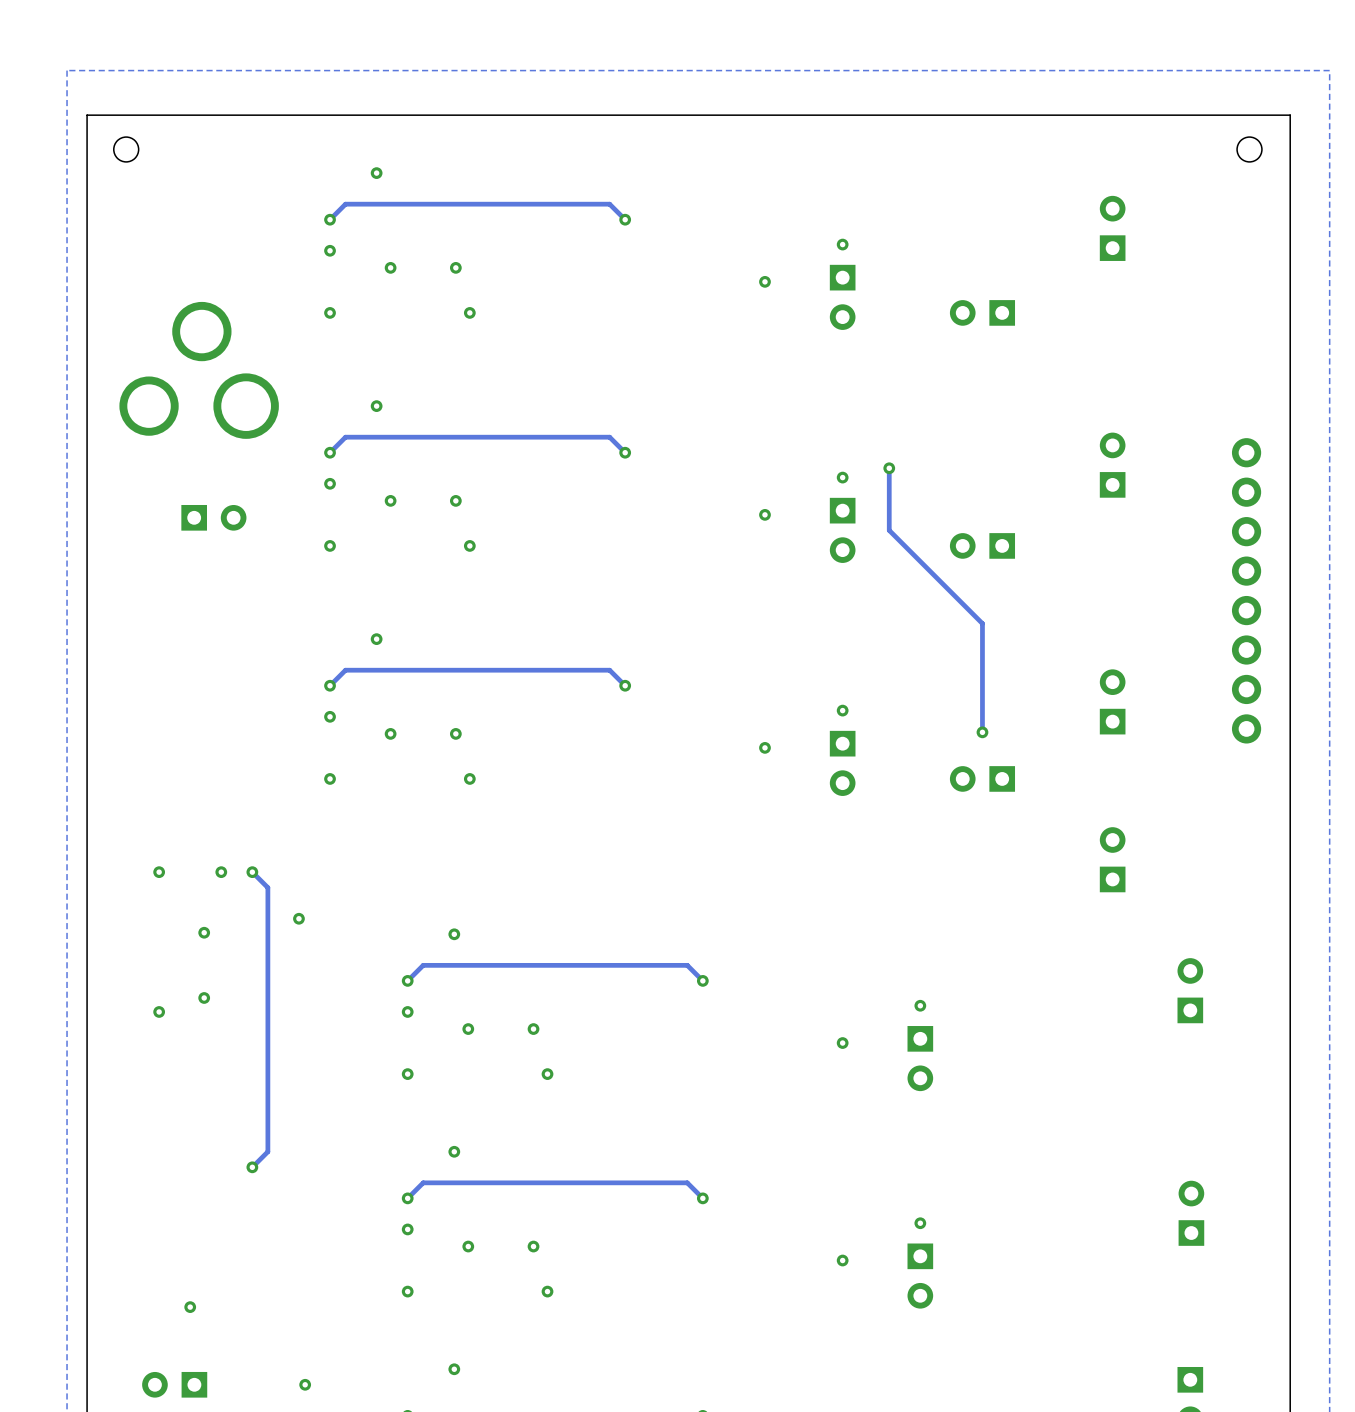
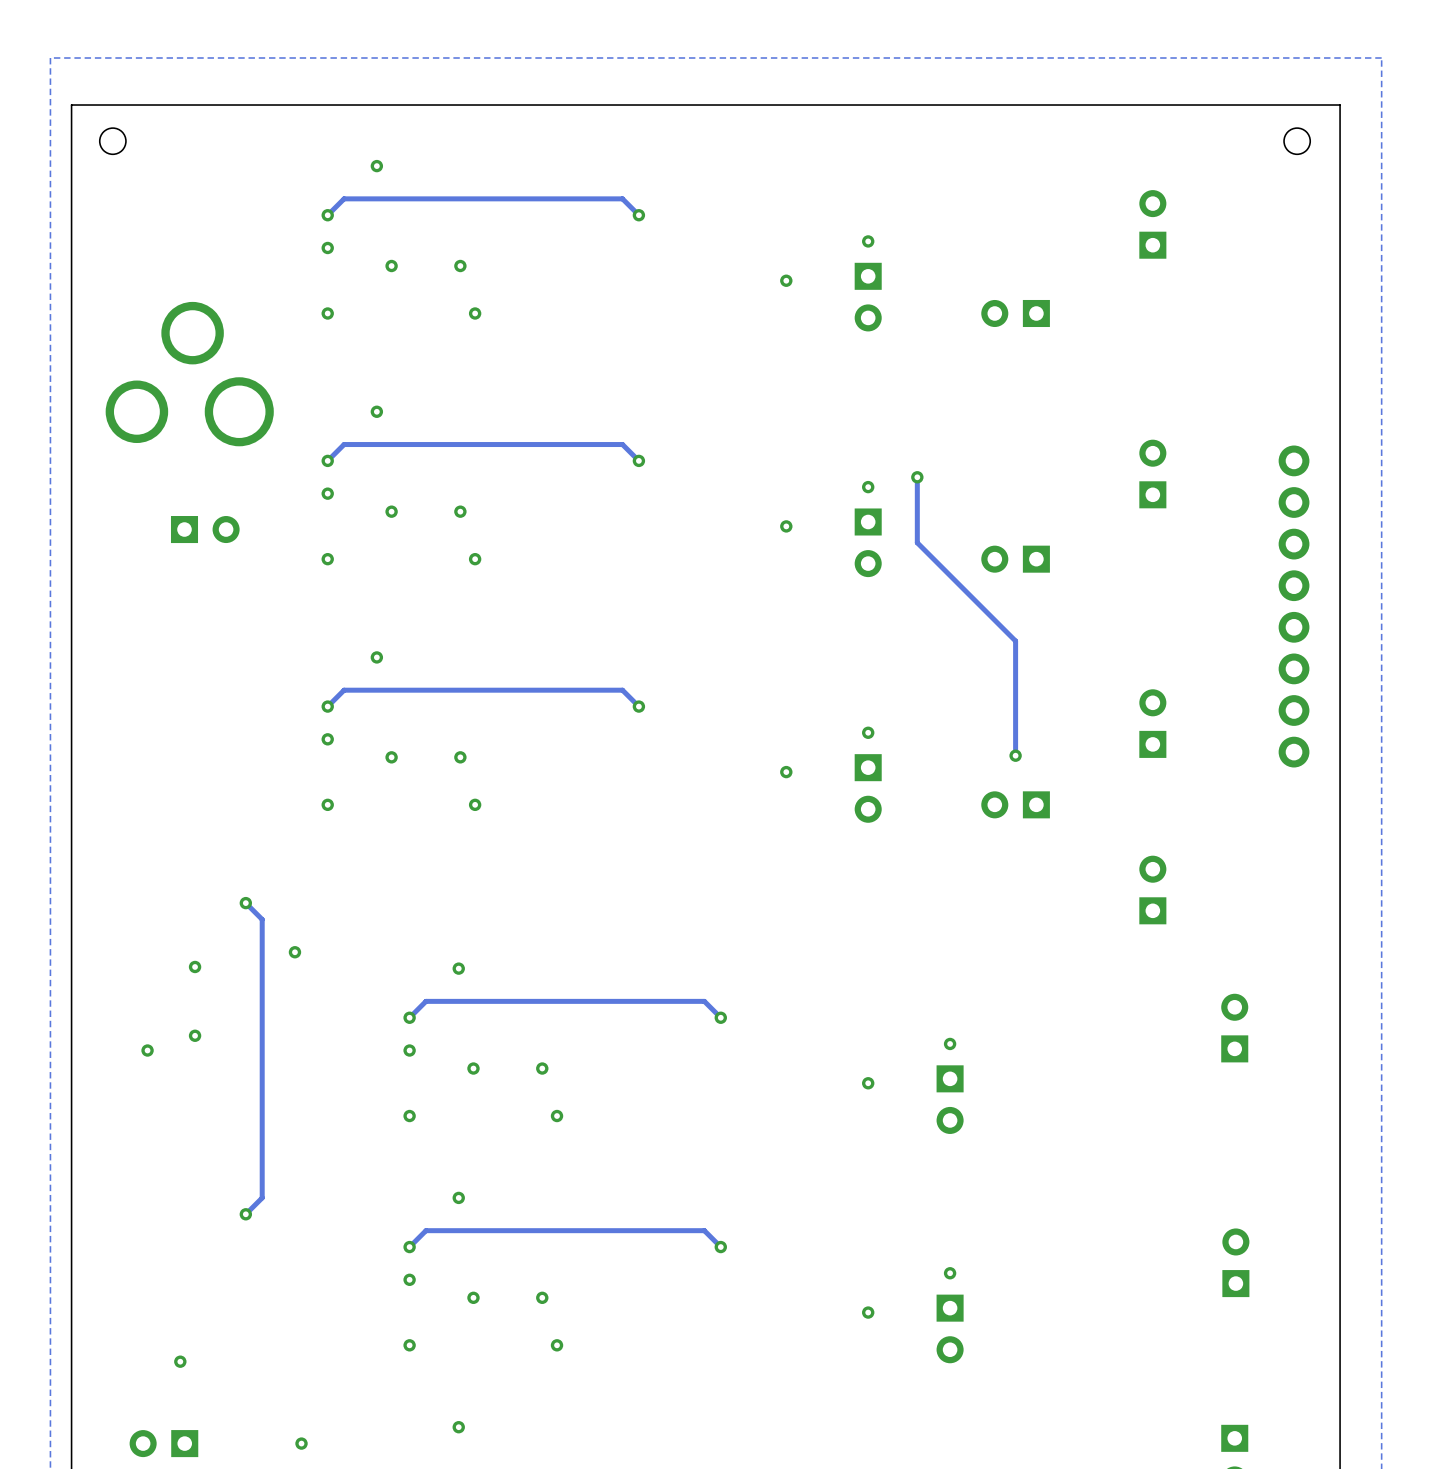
via: (159, 872) -> none
via: (221, 872) -> none

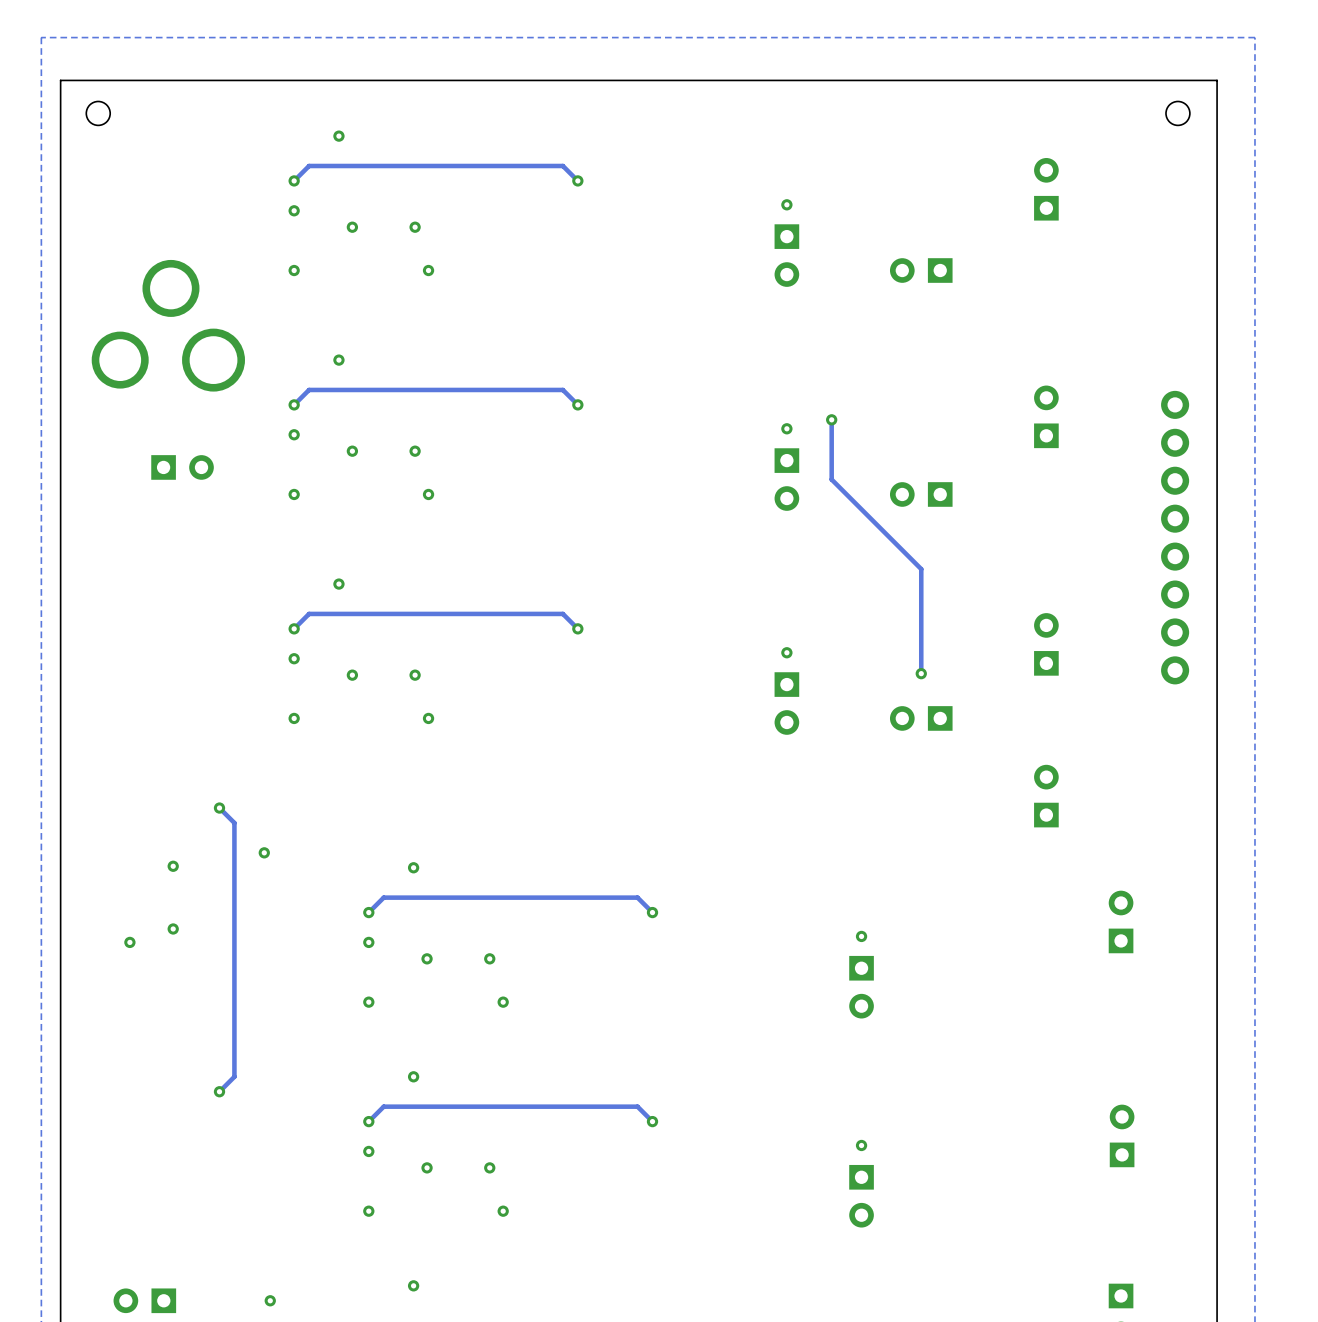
via: (786, 280) -> none
via: (786, 526) -> none
via: (786, 772) -> none
via: (868, 1083) -> none
via: (868, 1312) -> none
via: (180, 1361) -> none

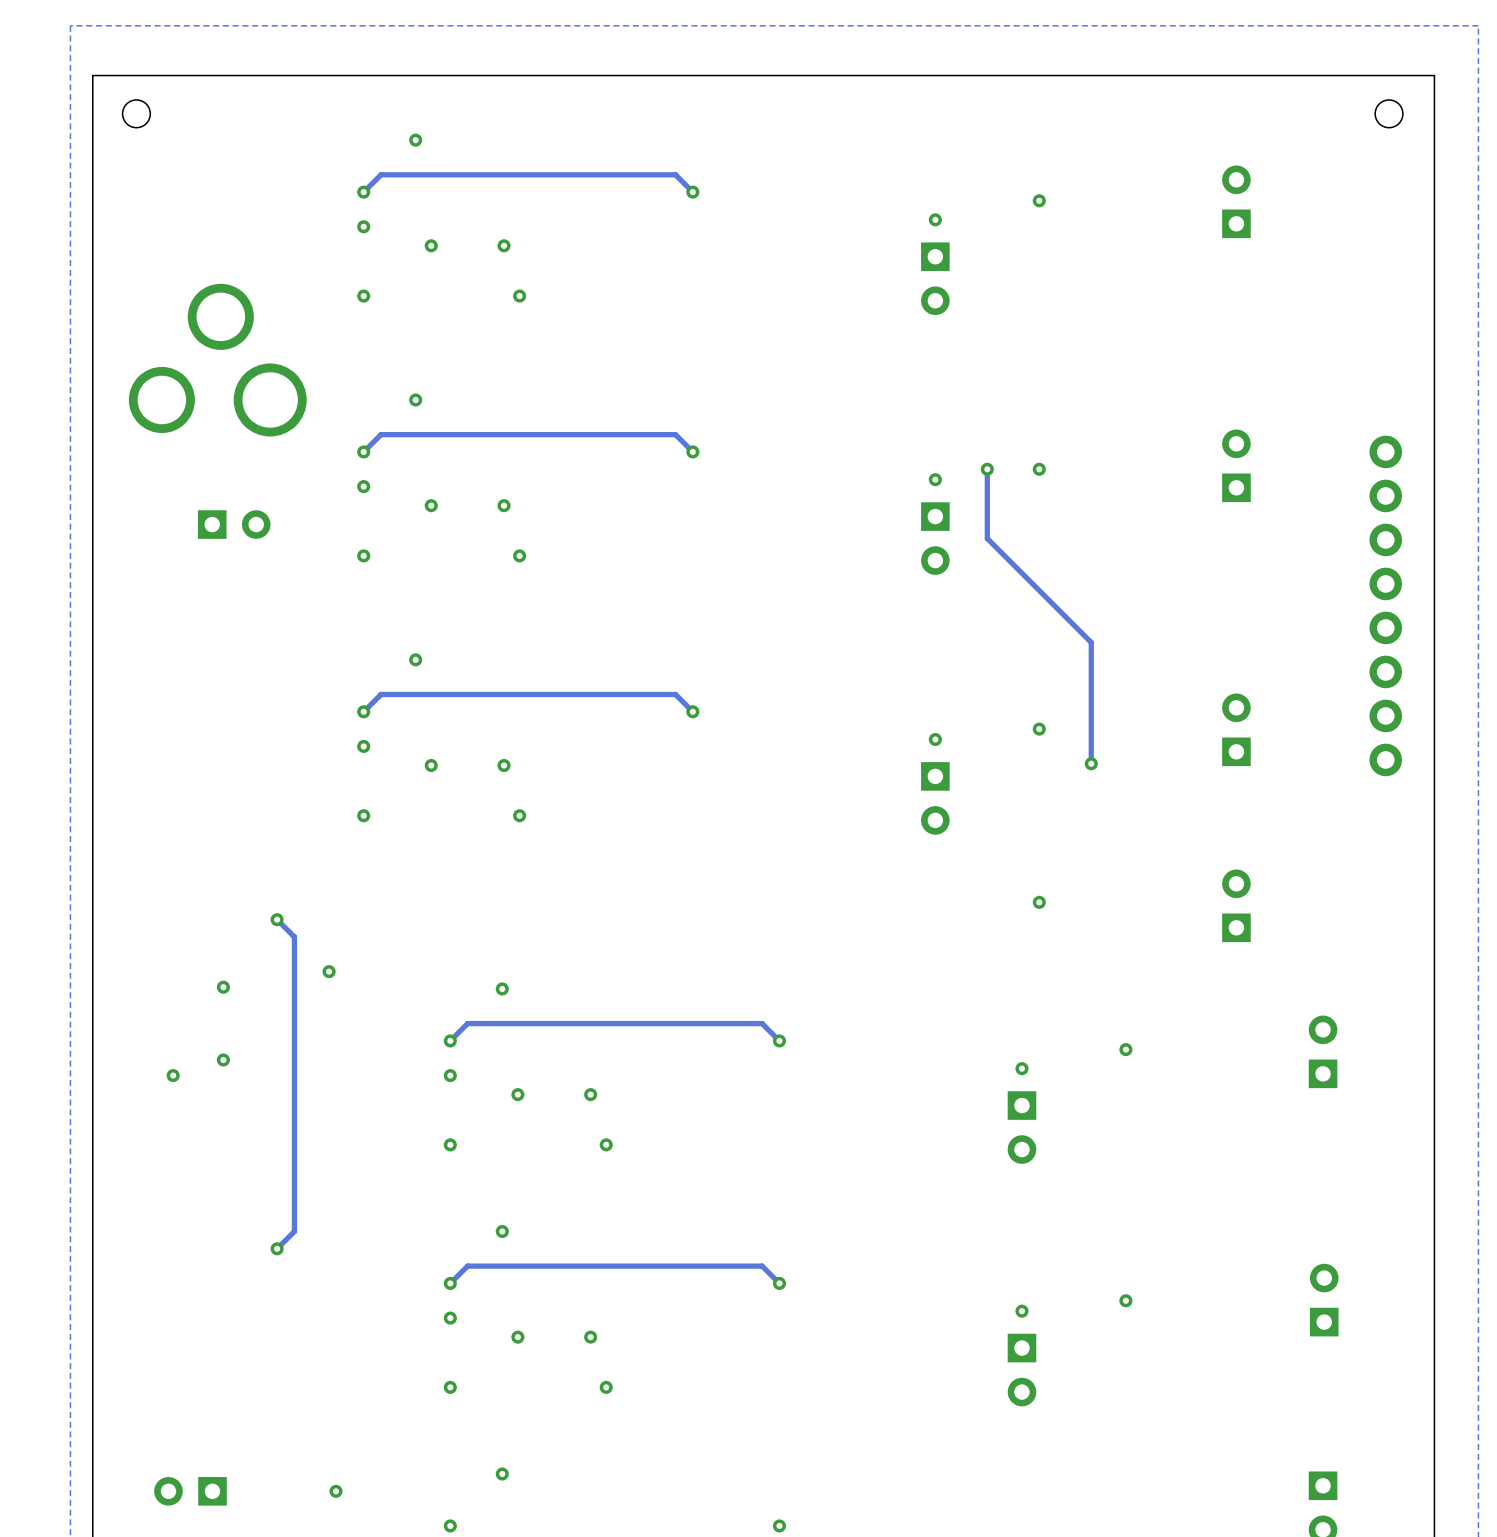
via: none -> (1039, 200)
part: (921, 270) -> none
via: none -> (1039, 469)
part: (921, 494) -> none
via: none -> (1039, 729)
part: (921, 718) -> none
via: none -> (1039, 902)
via: none -> (1125, 1049)
via: none -> (1125, 1300)

